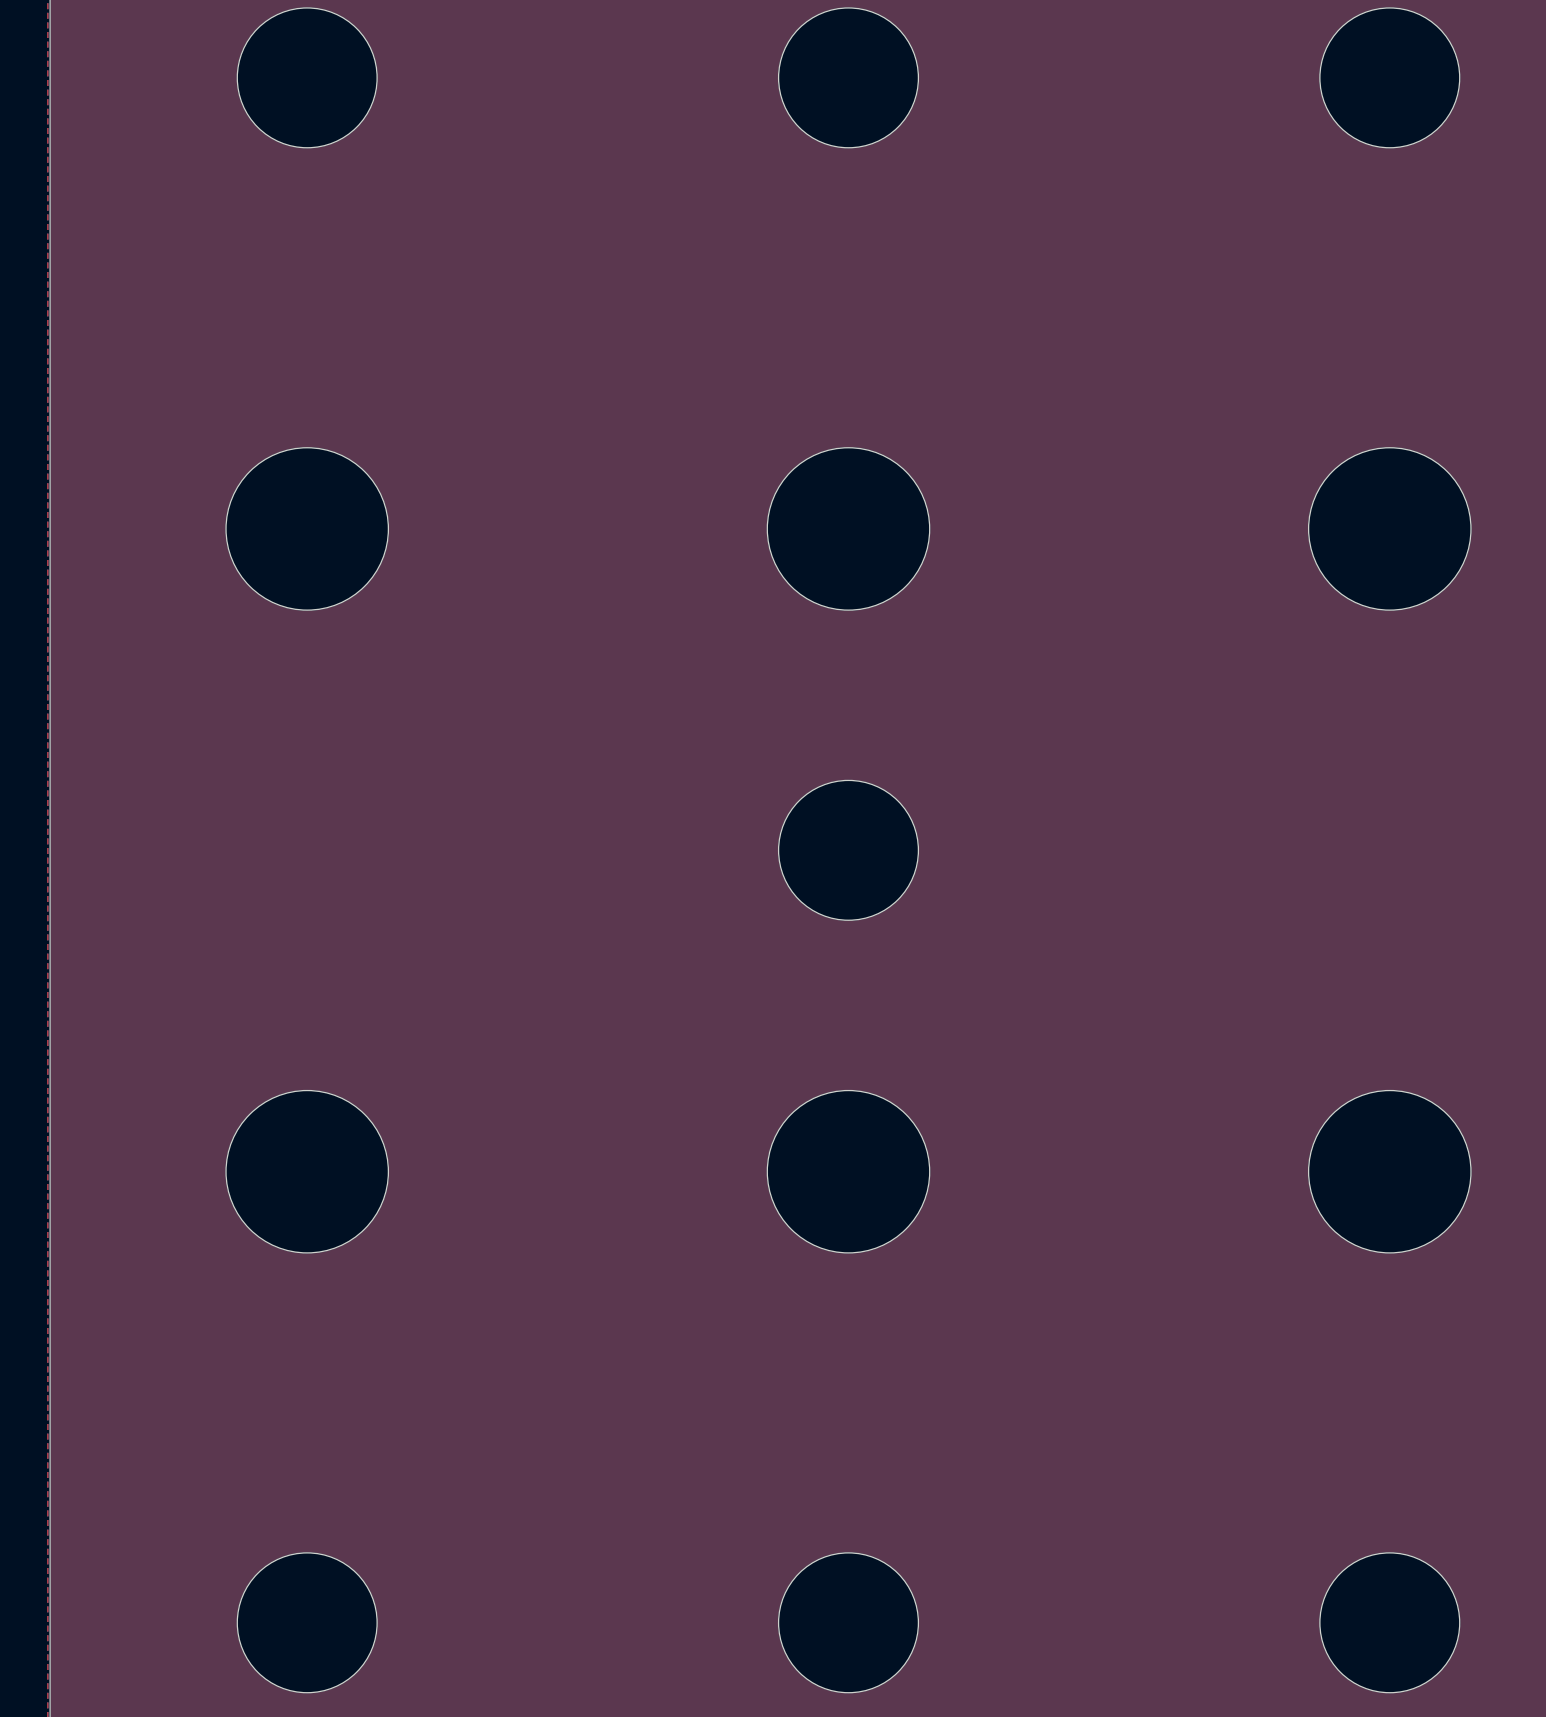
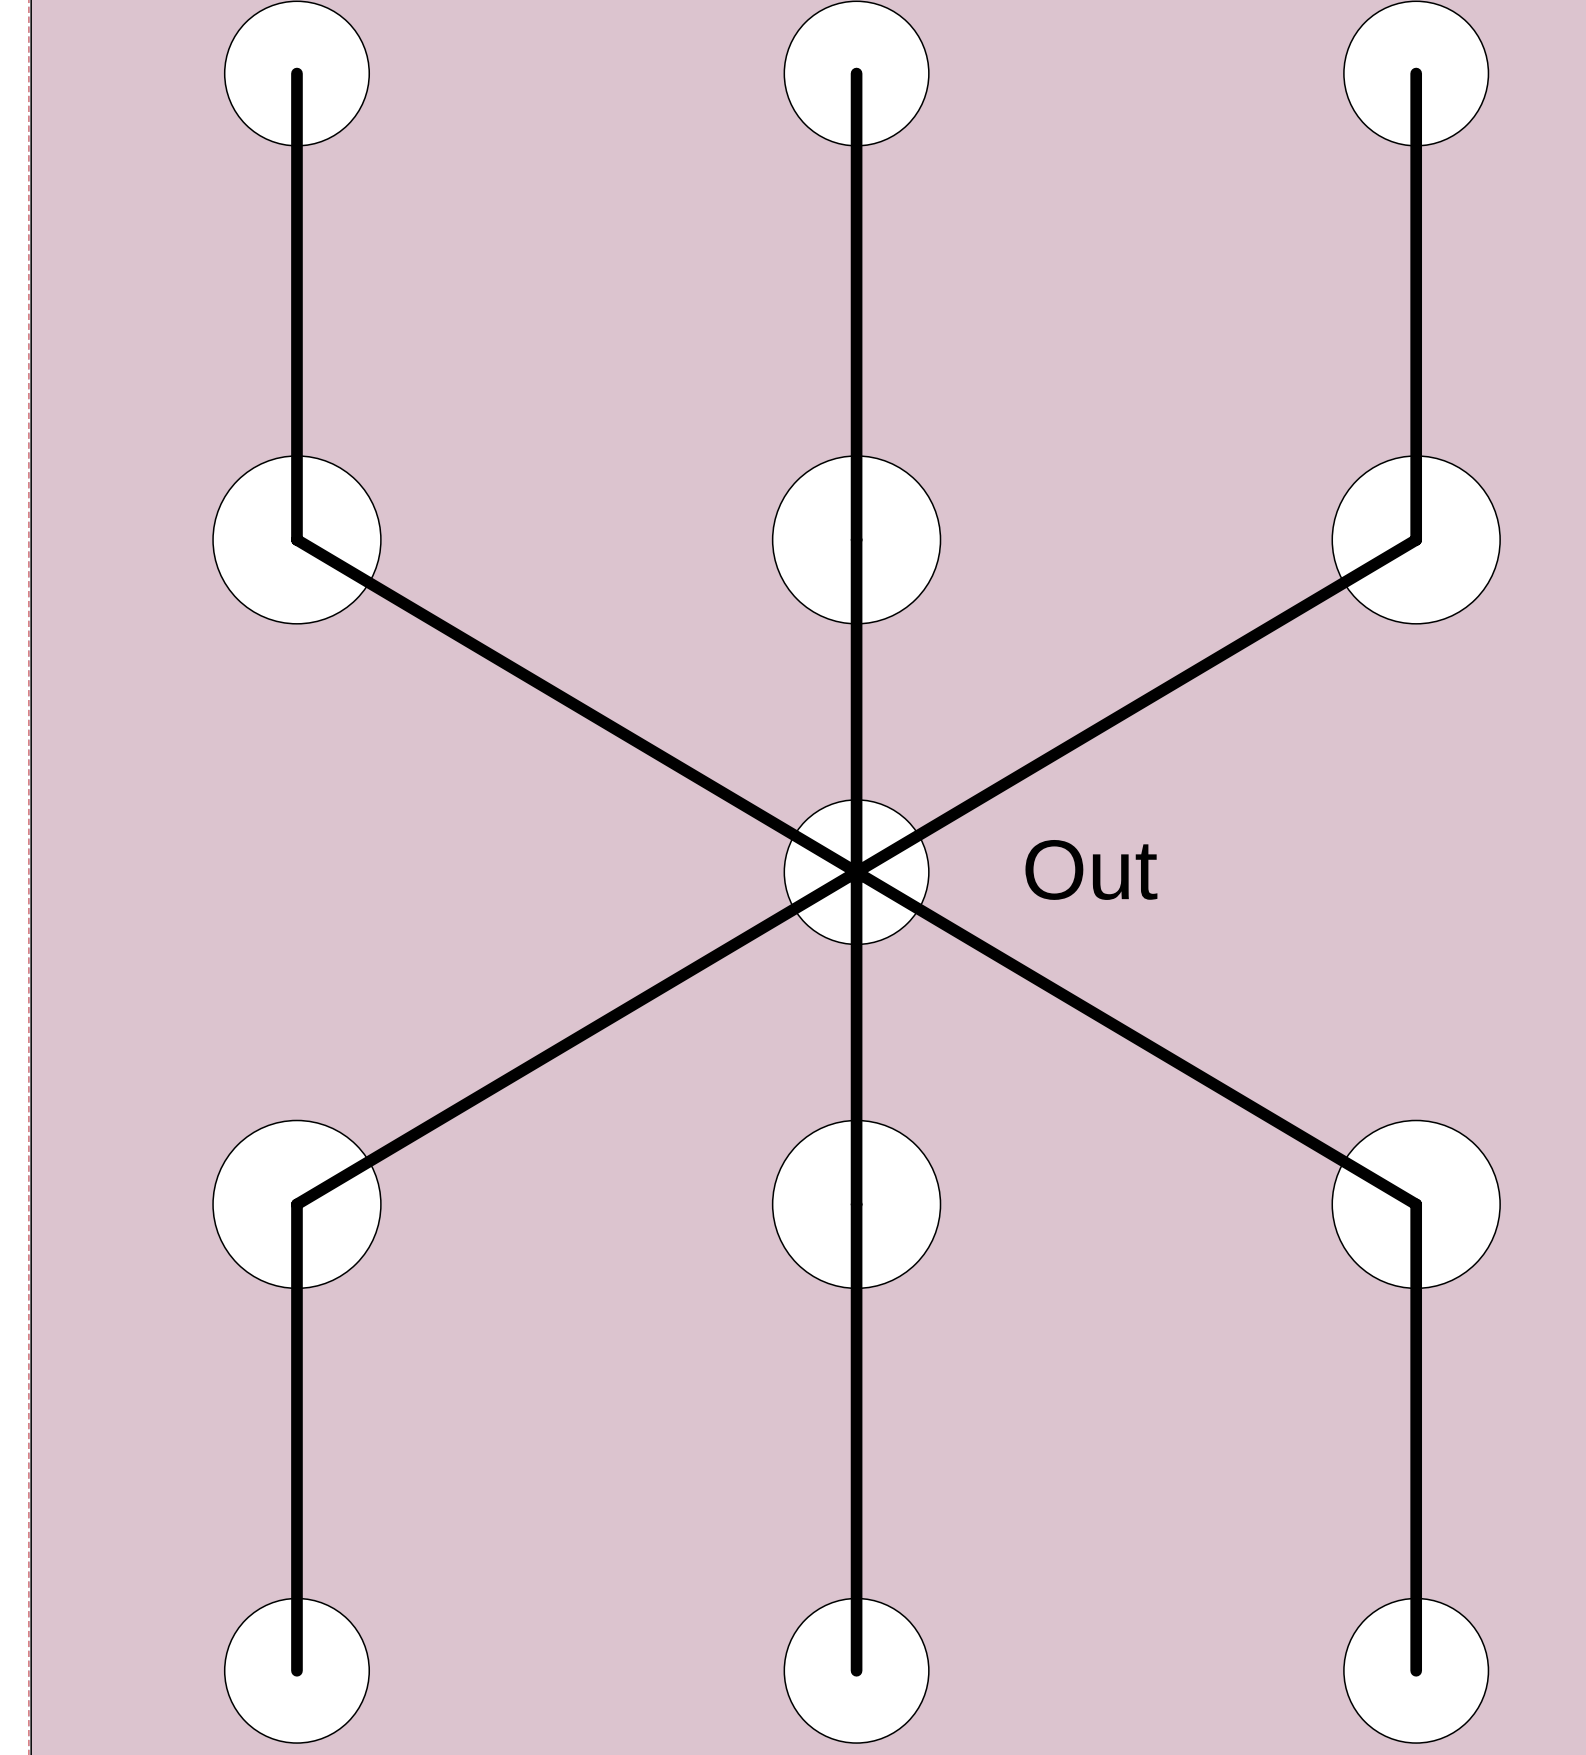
line: none -> (296, 73) (296, 539) (1416, 1204) (1416, 1670)
line: none -> (856, 73) (856, 1670)
line: none -> (1416, 73) (1416, 539) (296, 1204) (296, 1670)
text: none -> Out (1091, 869)

